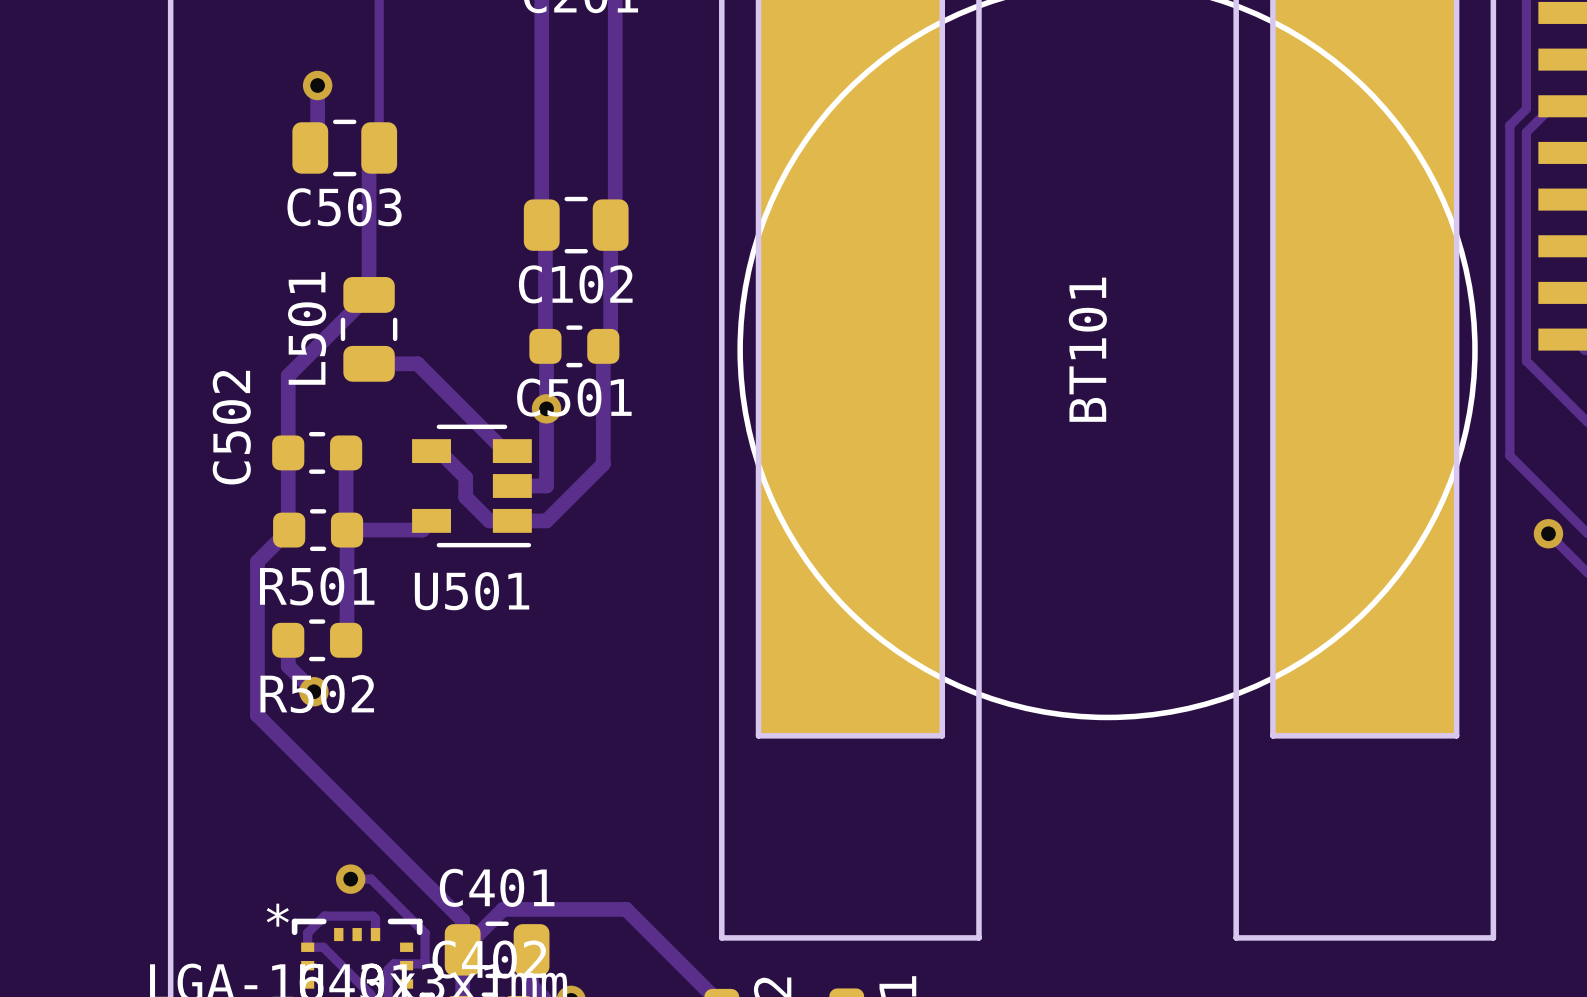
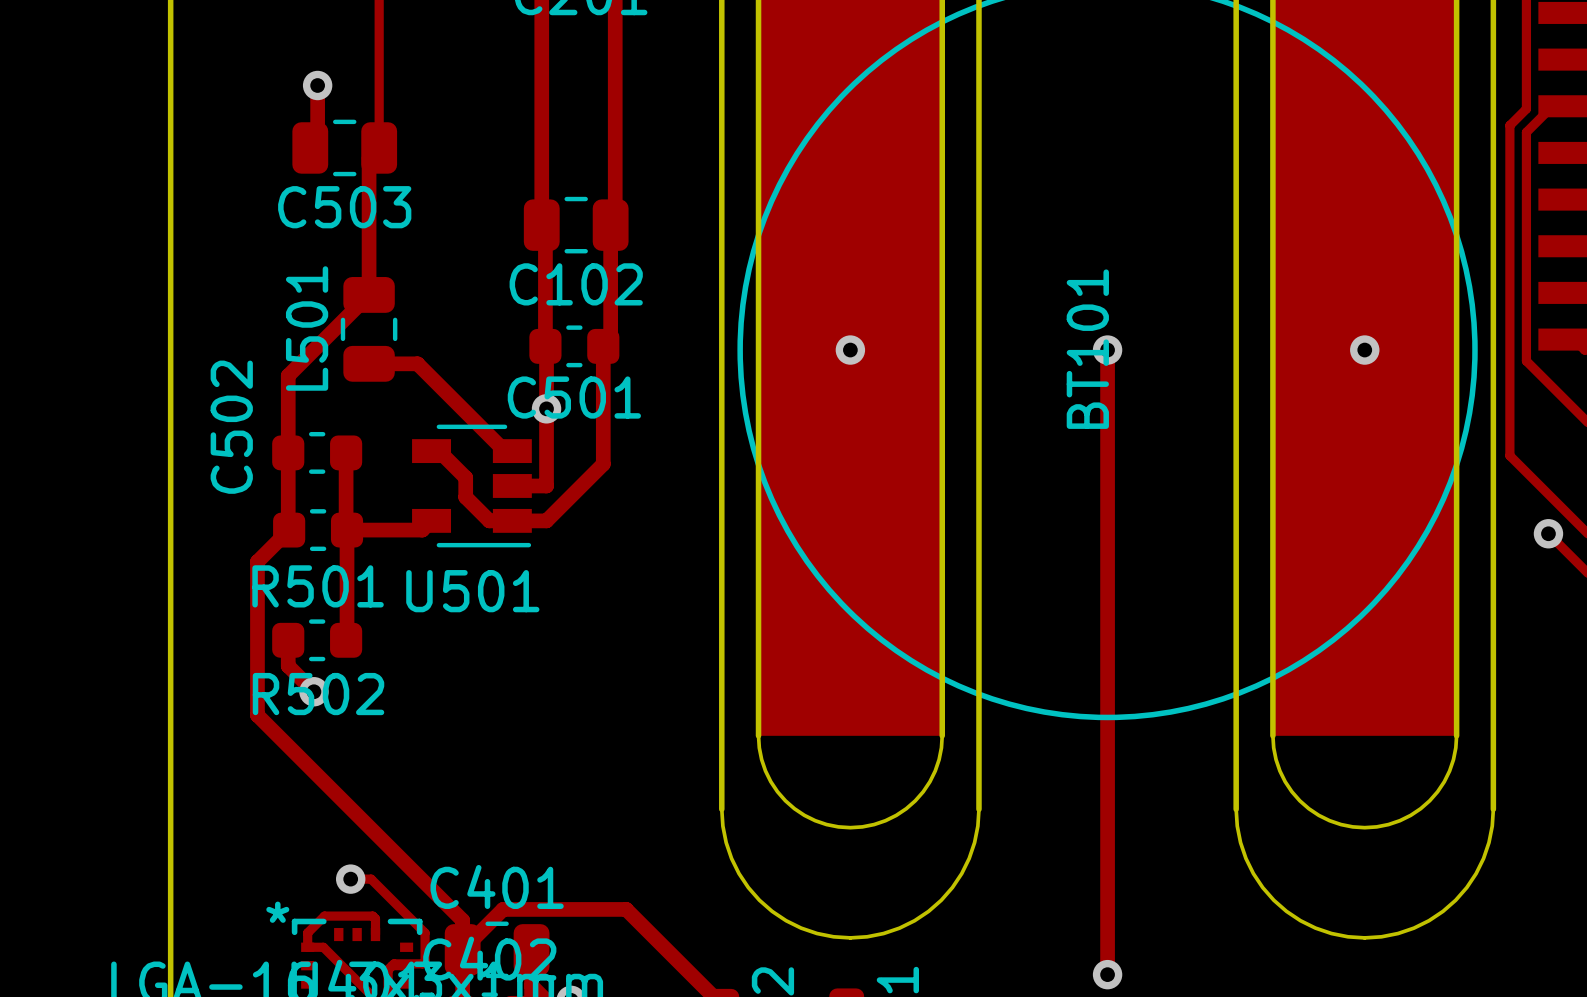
via: none -> (850, 350)
track: none -> (1107, 350) (1107, 974)
via: none -> (1107, 350)
via: none -> (1364, 350)
board edge: (758, 735) (942, 735) -> (758, 735) (759, 747) (765, 770) (770, 781) (785, 800) (804, 815) (815, 820) (838, 826) (850, 827) (862, 826) (885, 820) (896, 815) (915, 800) (929, 781) (935, 770) (941, 747) (942, 735)
board edge: (1272, 735) (1456, 735) -> (1272, 735) (1273, 747) (1279, 770) (1285, 781) (1299, 800) (1318, 815) (1329, 820) (1352, 826) (1364, 827) (1376, 826) (1399, 820) (1410, 815) (1429, 800) (1444, 781) (1449, 770) (1455, 747) (1456, 735)
board edge: (721, 809) (721, 937) (978, 937) (978, 809) -> (721, 809) (726, 842) (731, 858) (748, 887) (759, 900) (772, 911) (801, 928) (817, 933) (850, 937) (883, 933) (899, 928) (928, 911) (941, 900) (952, 887) (969, 858) (974, 842) (978, 809)
board edge: (1236, 809) (1236, 937) (1493, 937) (1493, 809) -> (1236, 809) (1240, 842) (1245, 858) (1262, 887) (1273, 900) (1286, 911) (1315, 928) (1331, 933) (1364, 937) (1398, 933) (1413, 928) (1443, 911) (1455, 900) (1466, 887) (1483, 858) (1488, 842) (1493, 809)
via: none -> (1107, 974)

